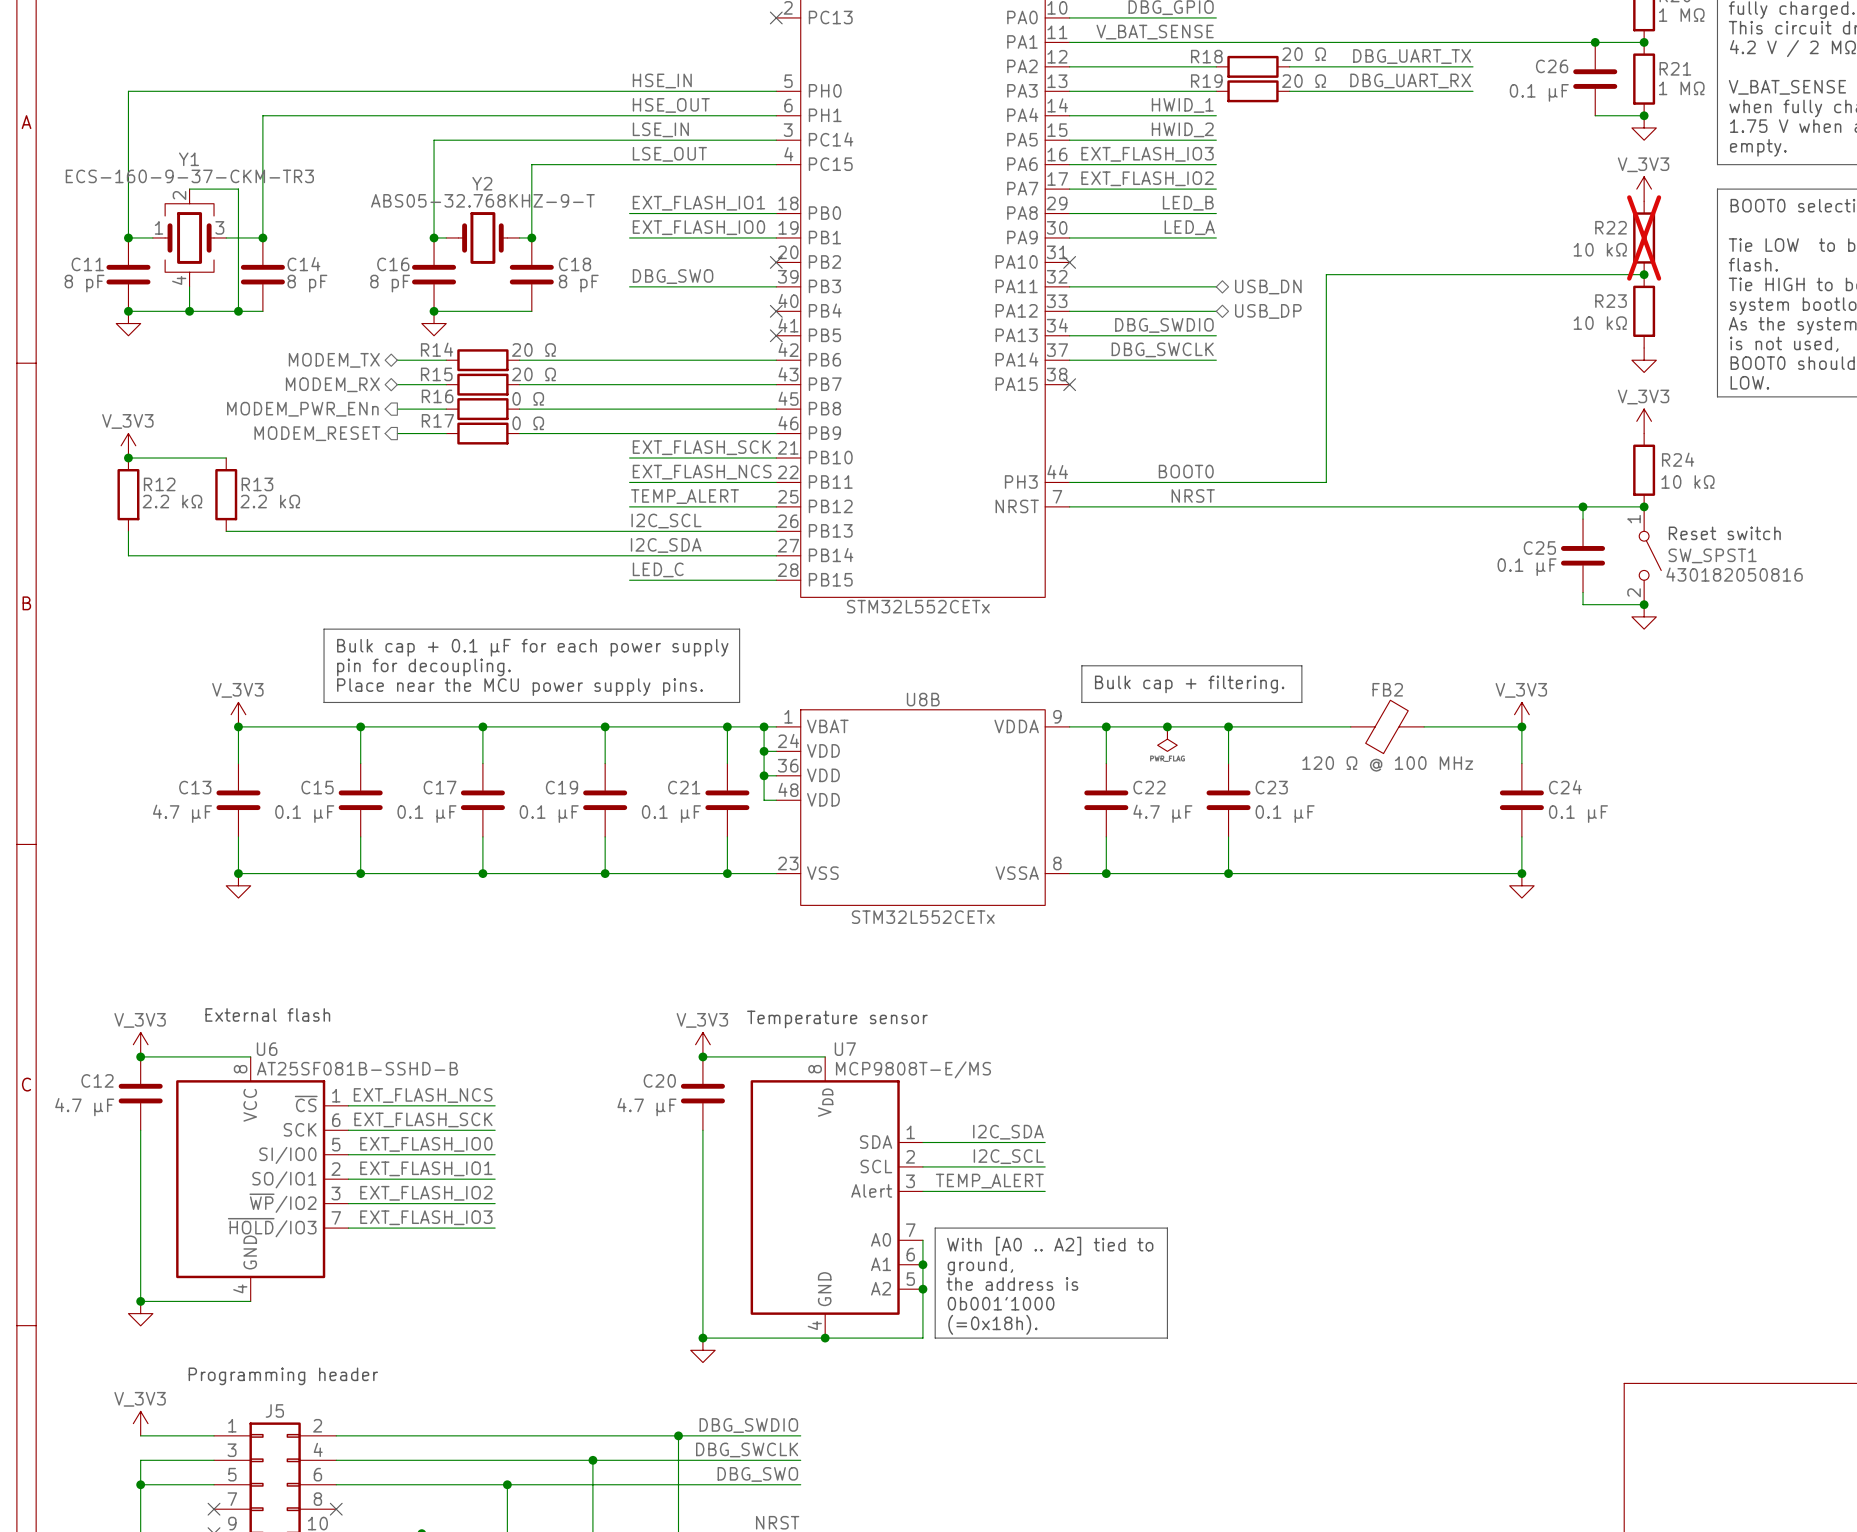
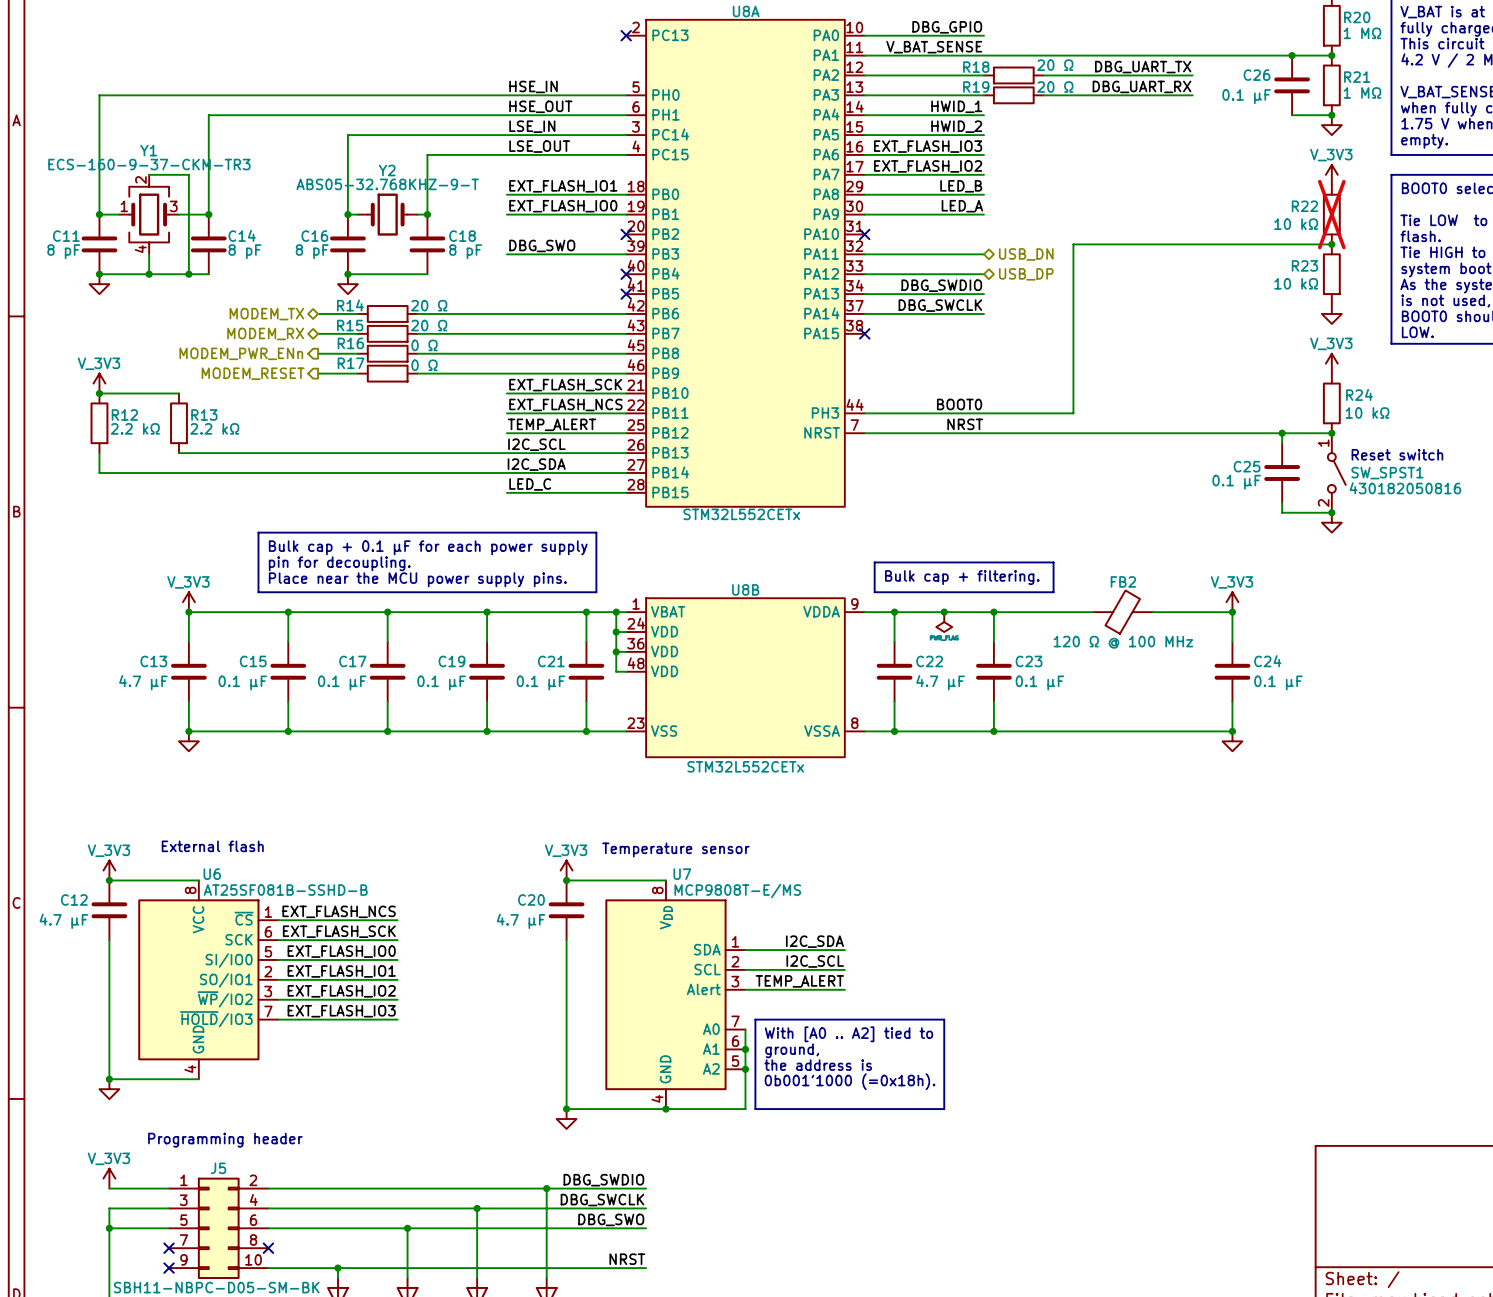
text: 0b001'1000 (1001, 1303) -> 0b001'1000 (=0x18h). (850, 1081)
text: (=0x18h). (992, 1324) -> none

